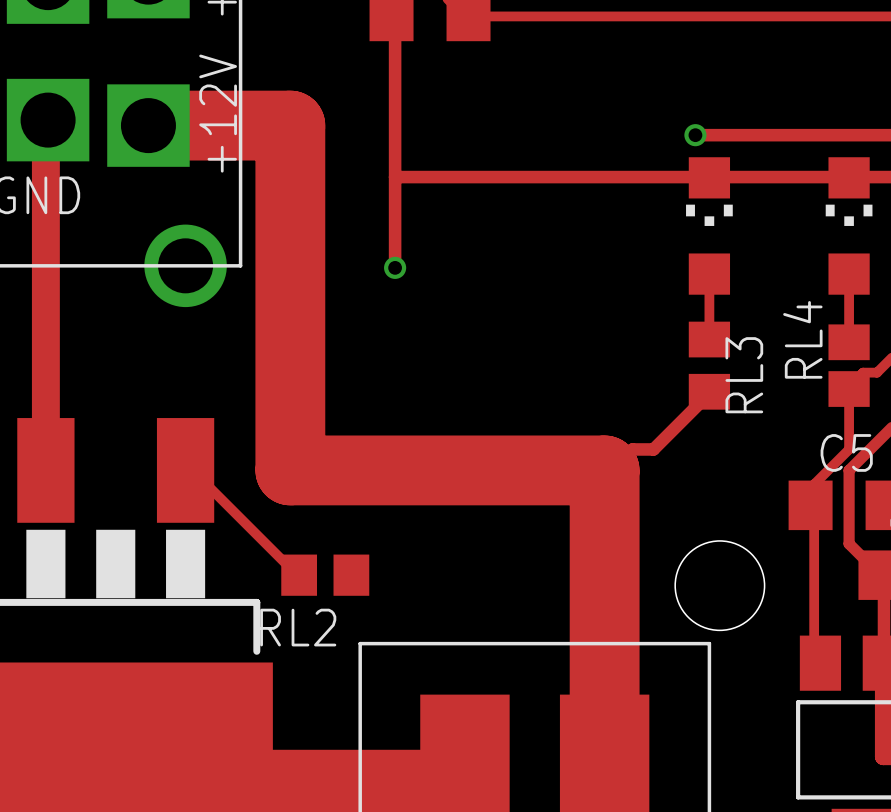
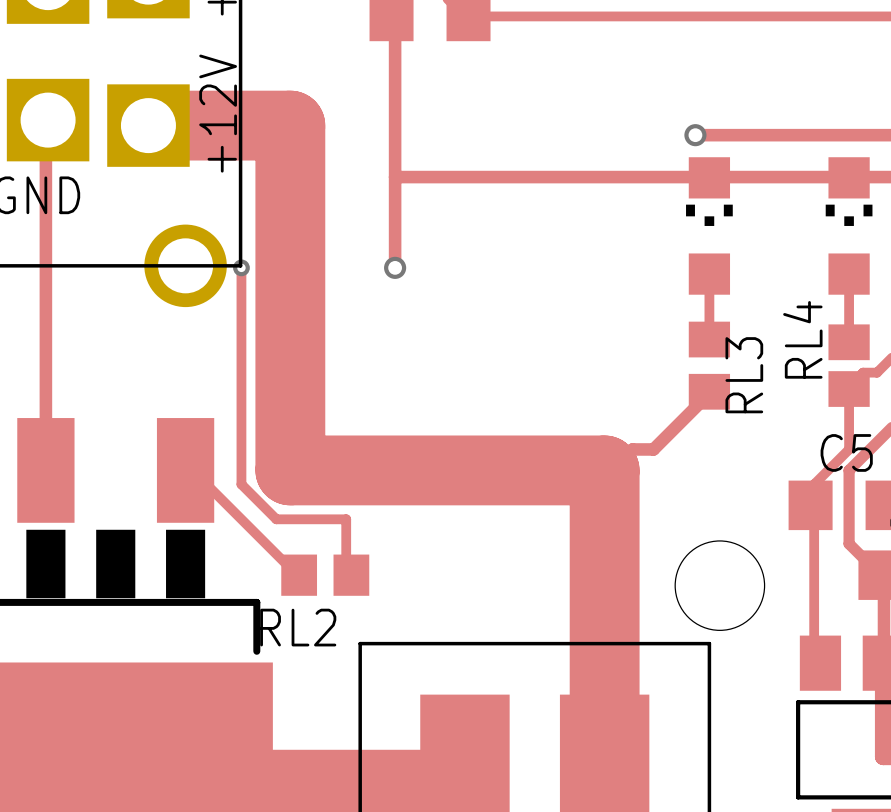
track width: thick (45, 121) (45, 470) -> thin (45, 121) (45, 470)
track: none -> (241, 267) (241, 484) (276, 519) (346, 519) (346, 575) (351, 575)
via: none -> (241, 267)

